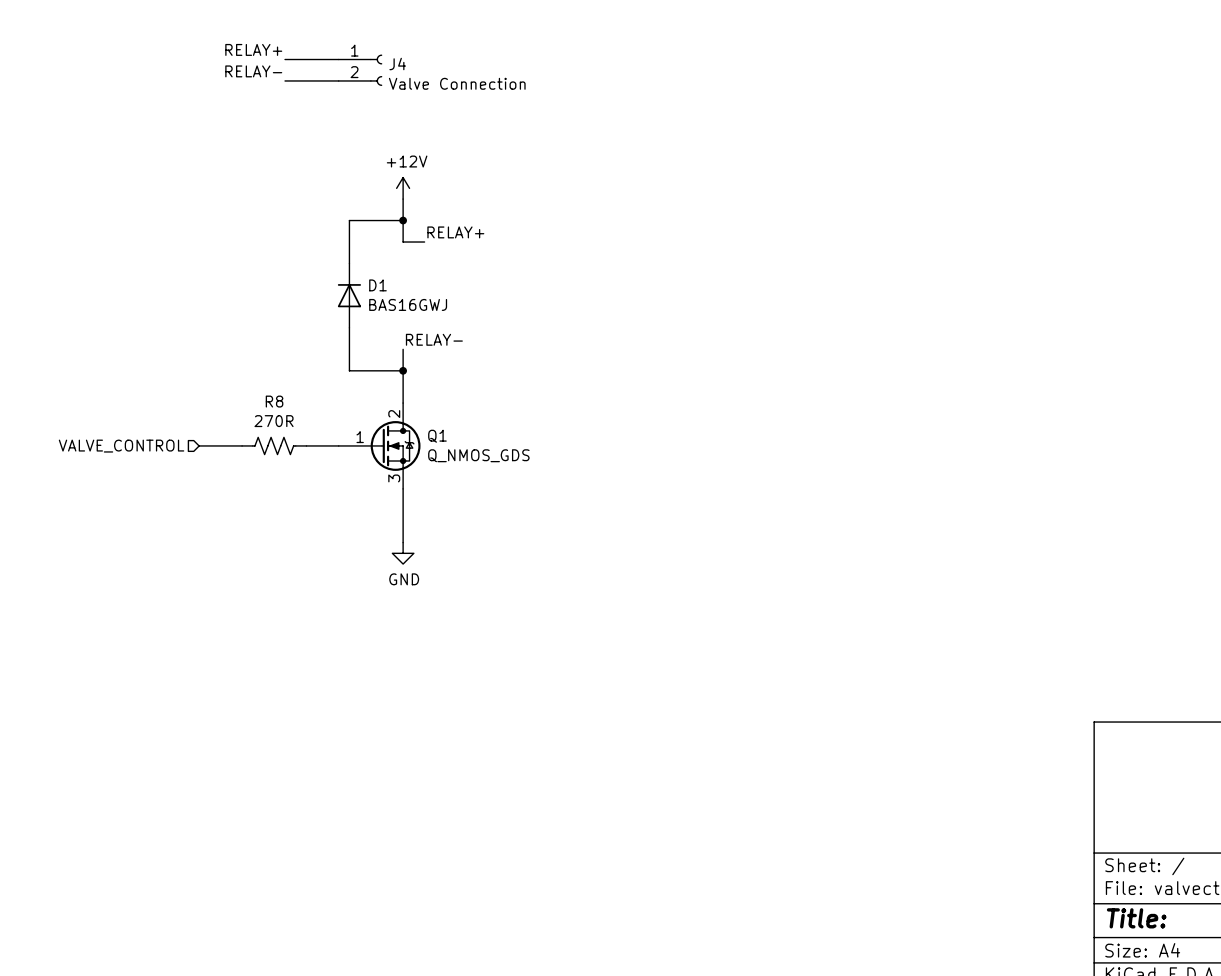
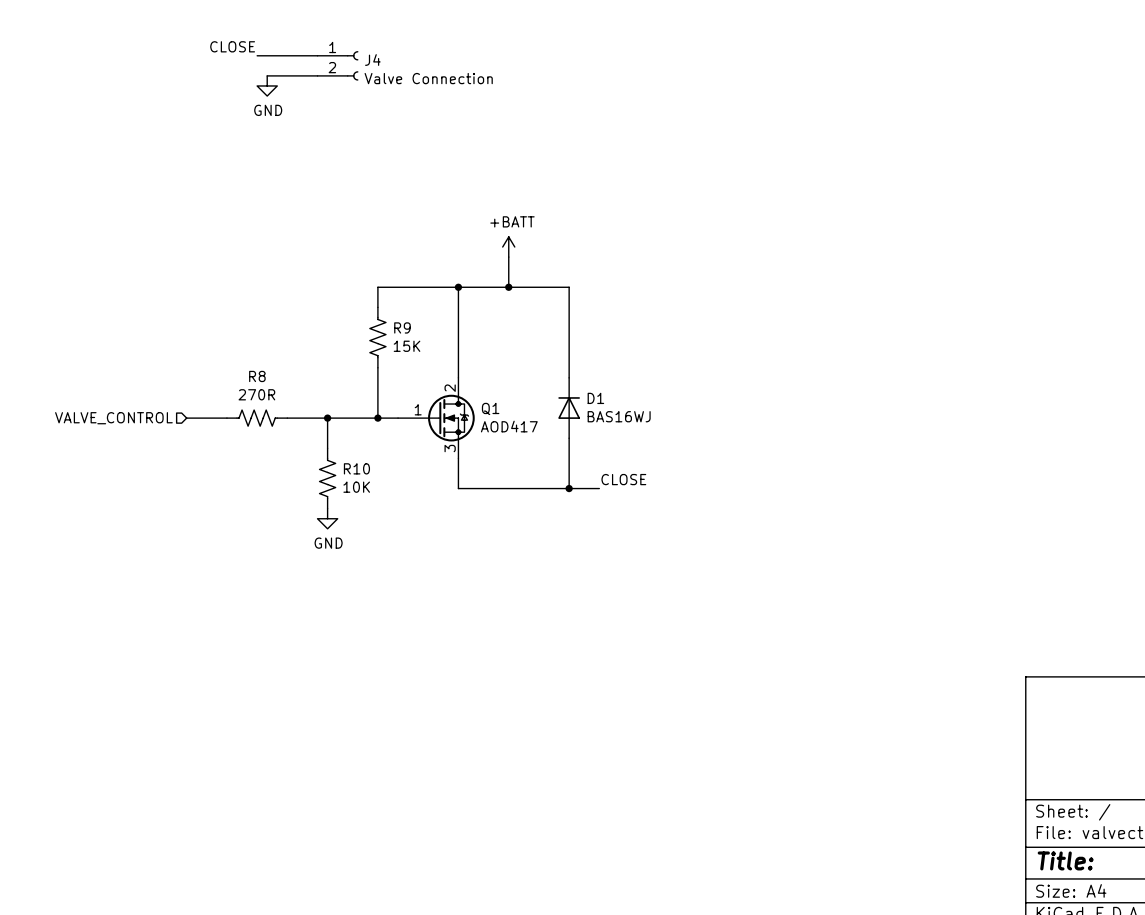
label: none -> CLOSE (232, 46)
label: RELAY+ (253, 49) -> none
wire: none -> (257, 55) (267, 55)
label: RELAY- (253, 71) -> none
power symbol: none -> GND (267, 85)
power symbol: +12V (403, 188) -> none
wire: (403, 199) (403, 242) (424, 242) -> none
wire: (403, 220) (349, 220) (349, 263) -> none
junction: (403, 220) -> none
label: RELAY+ (455, 232) -> none
power symbol: none -> +BATT (508, 247)
wire: none -> (508, 257) (508, 287)
D1 position: (349, 295) -> (569, 408)
D1 value: BAS16GWJ (408, 304) -> BAS16WJ (619, 416)
wire: none -> (458, 287) (458, 377)
junction: none -> (458, 287)
junction: none -> (508, 287)
wire: (349, 327) (349, 370) (403, 370) -> none
wire: none -> (377, 307) (377, 287) (569, 287) (569, 377)
label: RELAY- (434, 339) -> none
R9: none -> 15K (377, 337)
junction: (403, 370) -> none
wire: none -> (327, 418) (327, 448)
junction: none -> (327, 418)
Q1 position: (379, 445) -> (436, 418)
junction: none -> (377, 418)
Q1 value: Q_NMOS_GDS (478, 455) -> AOD417 (509, 426)
wire: (403, 488) (403, 542) -> (569, 438) (569, 488)
wire: none -> (458, 458) (458, 488) (599, 488)
R10: none -> 10K (327, 478)
label: none -> CLOSE (623, 479)
junction: none -> (569, 488)
power symbol position: GND (403, 553) -> GND (327, 518)

